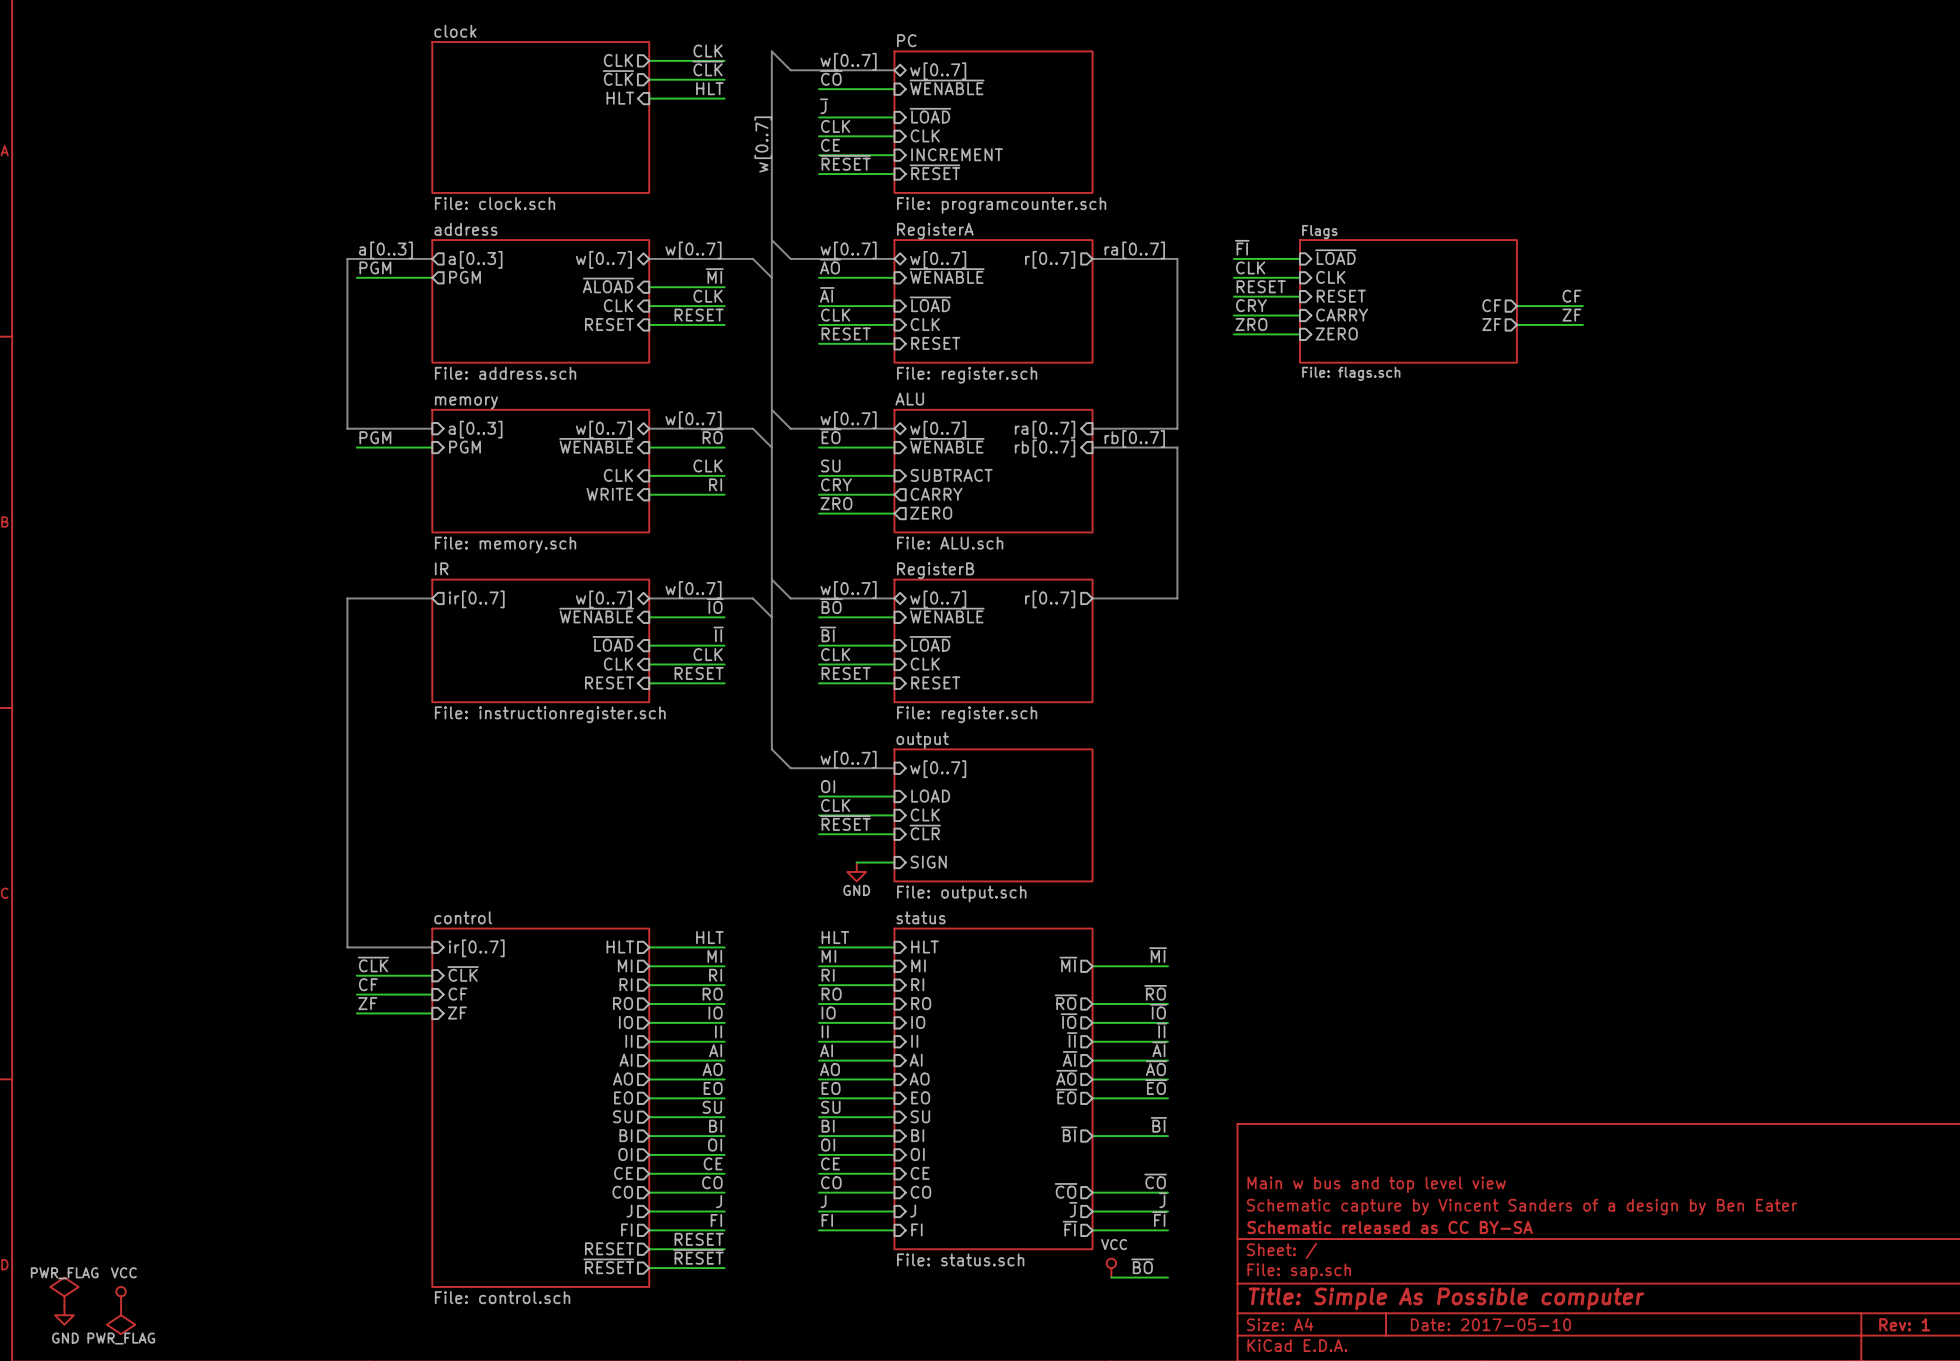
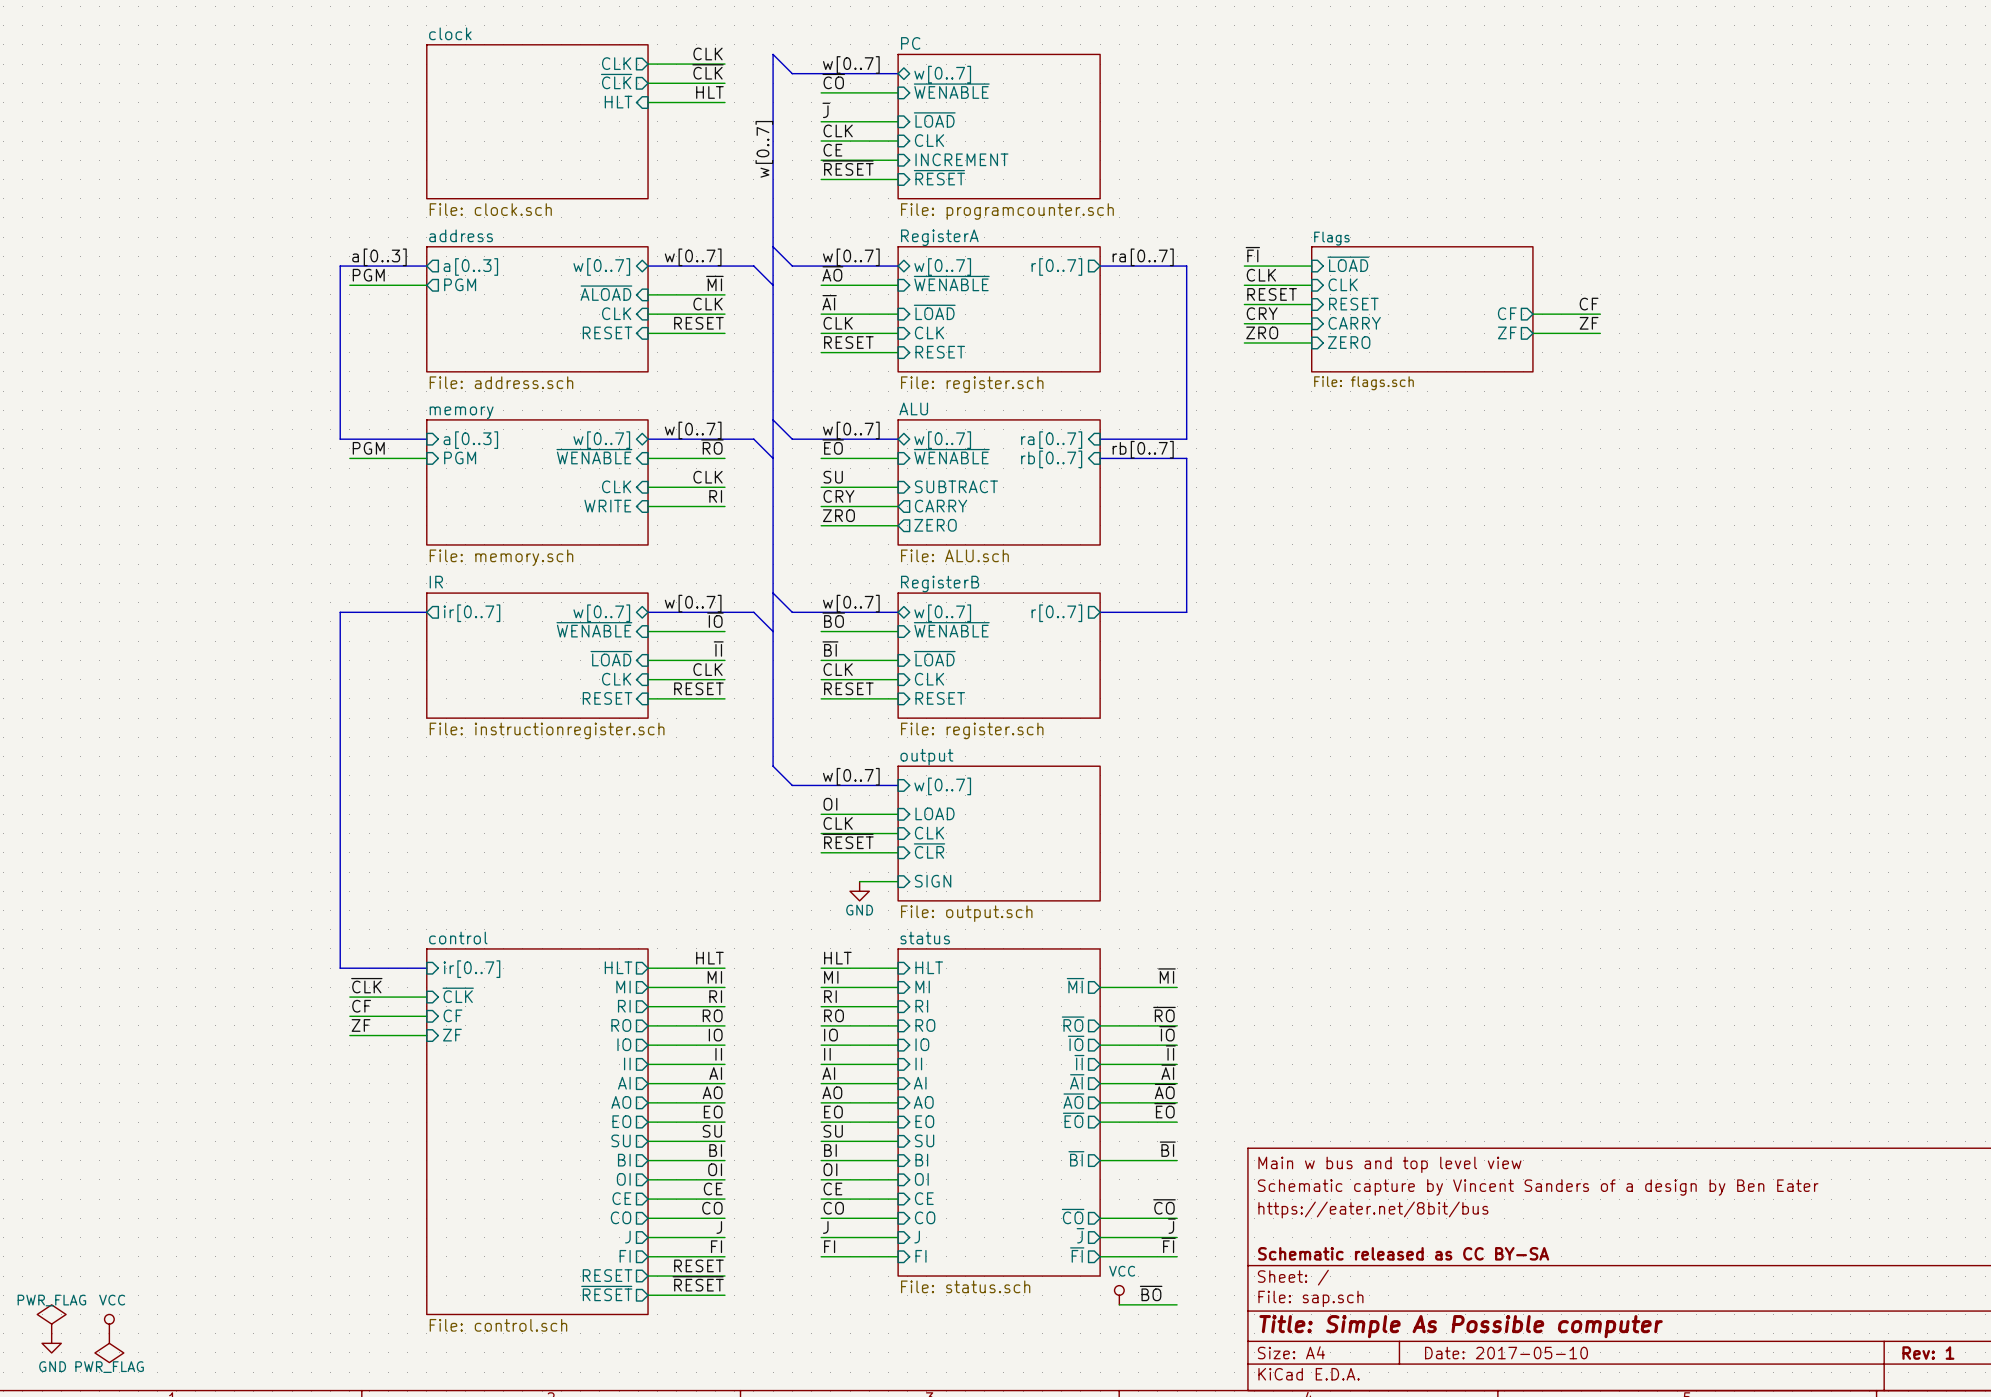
title block: none -> Main w bus and top level view (1389, 1164)
title block: Main w bus and top level view (1376, 1184) -> https://eater.net/8bit/bus (1373, 1210)
title block position: Schematic capture by Vincent Sanders of a design by Ben Eater (1522, 1207) -> Schematic capture by Vincent Sanders of a design by Ben Eater (1538, 1187)

